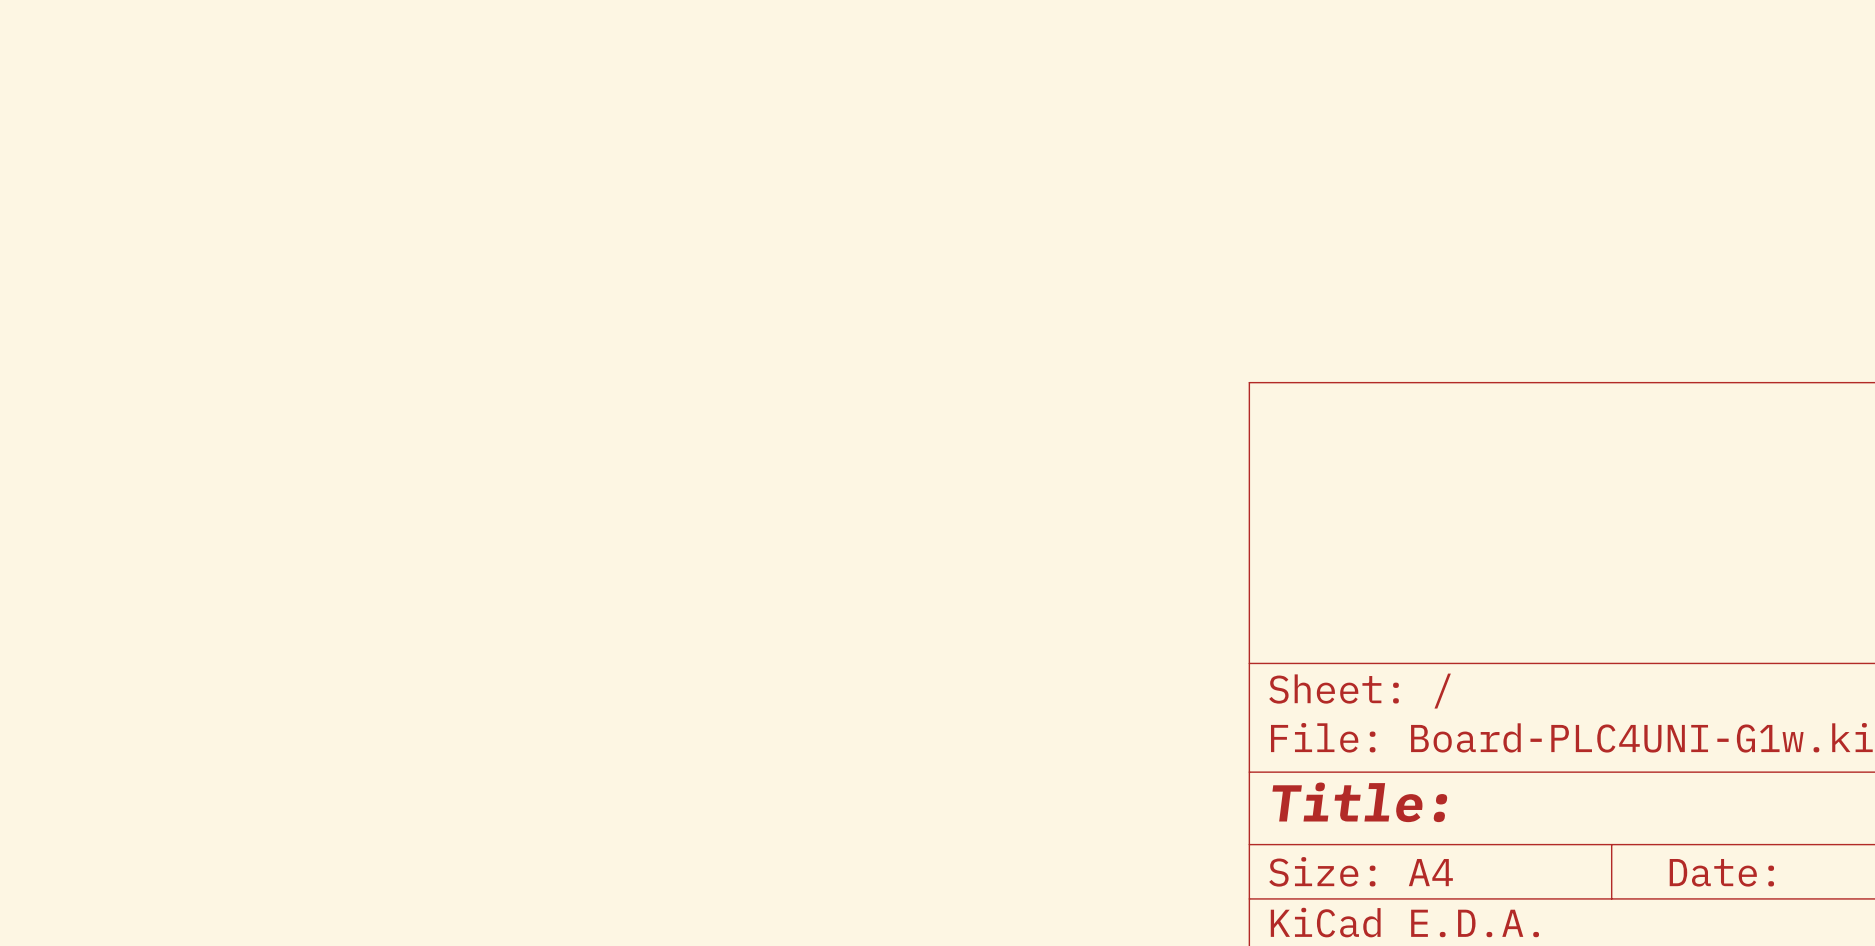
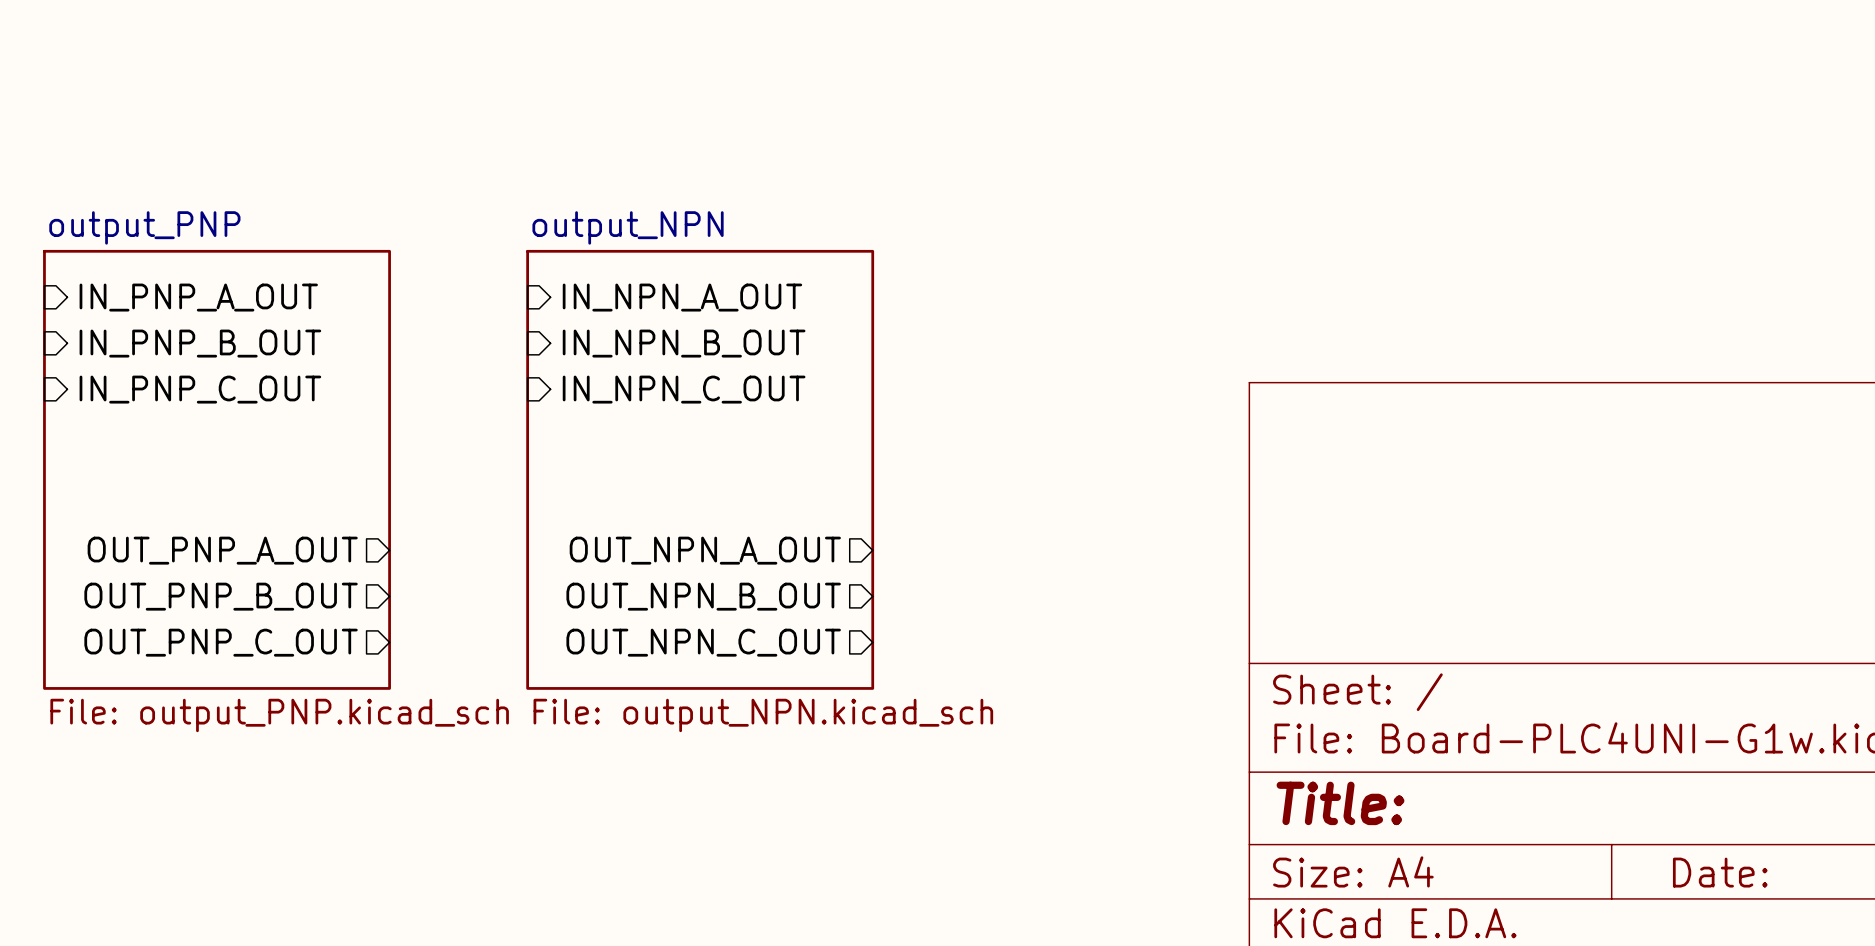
sheet pin: none -> IN_PNP_A_OUT (198, 297)
sheet pin: none -> IN_NPN_A_OUT (682, 297)
sheet pin: none -> IN_PNP_B_OUT (200, 343)
sheet pin: none -> IN_NPN_B_OUT (684, 343)
sheet pin: none -> IN_PNP_C_OUT (200, 389)
sheet pin: none -> IN_NPN_C_OUT (684, 389)
sheet output_PNP: none -> File: output_PNP.kicad_sch (217, 469)
sheet output_NPN: none -> File: output_NPN.kicad_sch (700, 469)
sheet pin: none -> OUT_PNP_A_OUT (222, 550)
sheet pin: none -> OUT_NPN_A_OUT (705, 550)
sheet pin: none -> OUT_PNP_B_OUT (221, 596)
sheet pin: none -> OUT_NPN_B_OUT (703, 596)
sheet pin: none -> OUT_PNP_C_OUT (221, 642)
sheet pin: none -> OUT_NPN_C_OUT (703, 642)

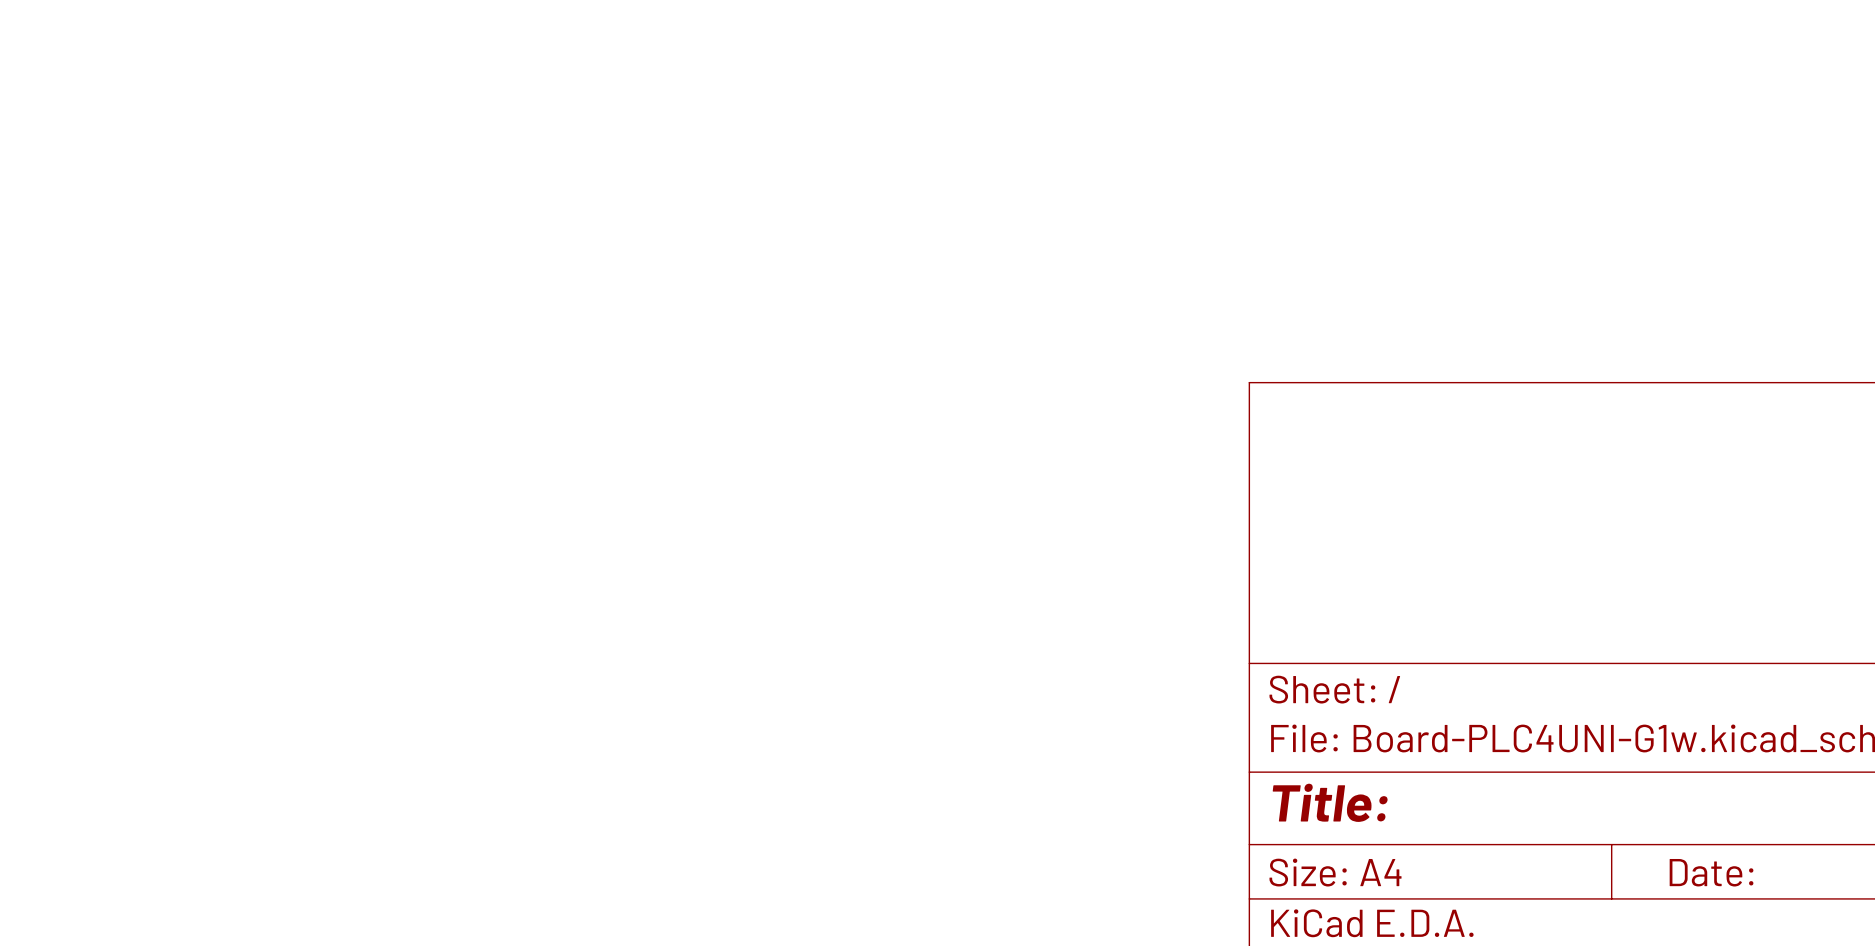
sheet pin: IN_PNP_A_OUT (198, 297) -> none
sheet pin: IN_NPN_A_OUT (682, 297) -> none
sheet pin: IN_PNP_B_OUT (200, 343) -> none
sheet pin: IN_NPN_B_OUT (684, 343) -> none
sheet pin: IN_PNP_C_OUT (200, 389) -> none
sheet pin: IN_NPN_C_OUT (684, 389) -> none
sheet output_PNP: File: output_PNP.kicad_sch (217, 469) -> none
sheet output_NPN: File: output_NPN.kicad_sch (700, 469) -> none
sheet pin: OUT_PNP_A_OUT (222, 550) -> none
sheet pin: OUT_NPN_A_OUT (705, 550) -> none
sheet pin: OUT_PNP_B_OUT (221, 596) -> none
sheet pin: OUT_NPN_B_OUT (703, 596) -> none
sheet pin: OUT_PNP_C_OUT (221, 642) -> none
sheet pin: OUT_NPN_C_OUT (703, 642) -> none

